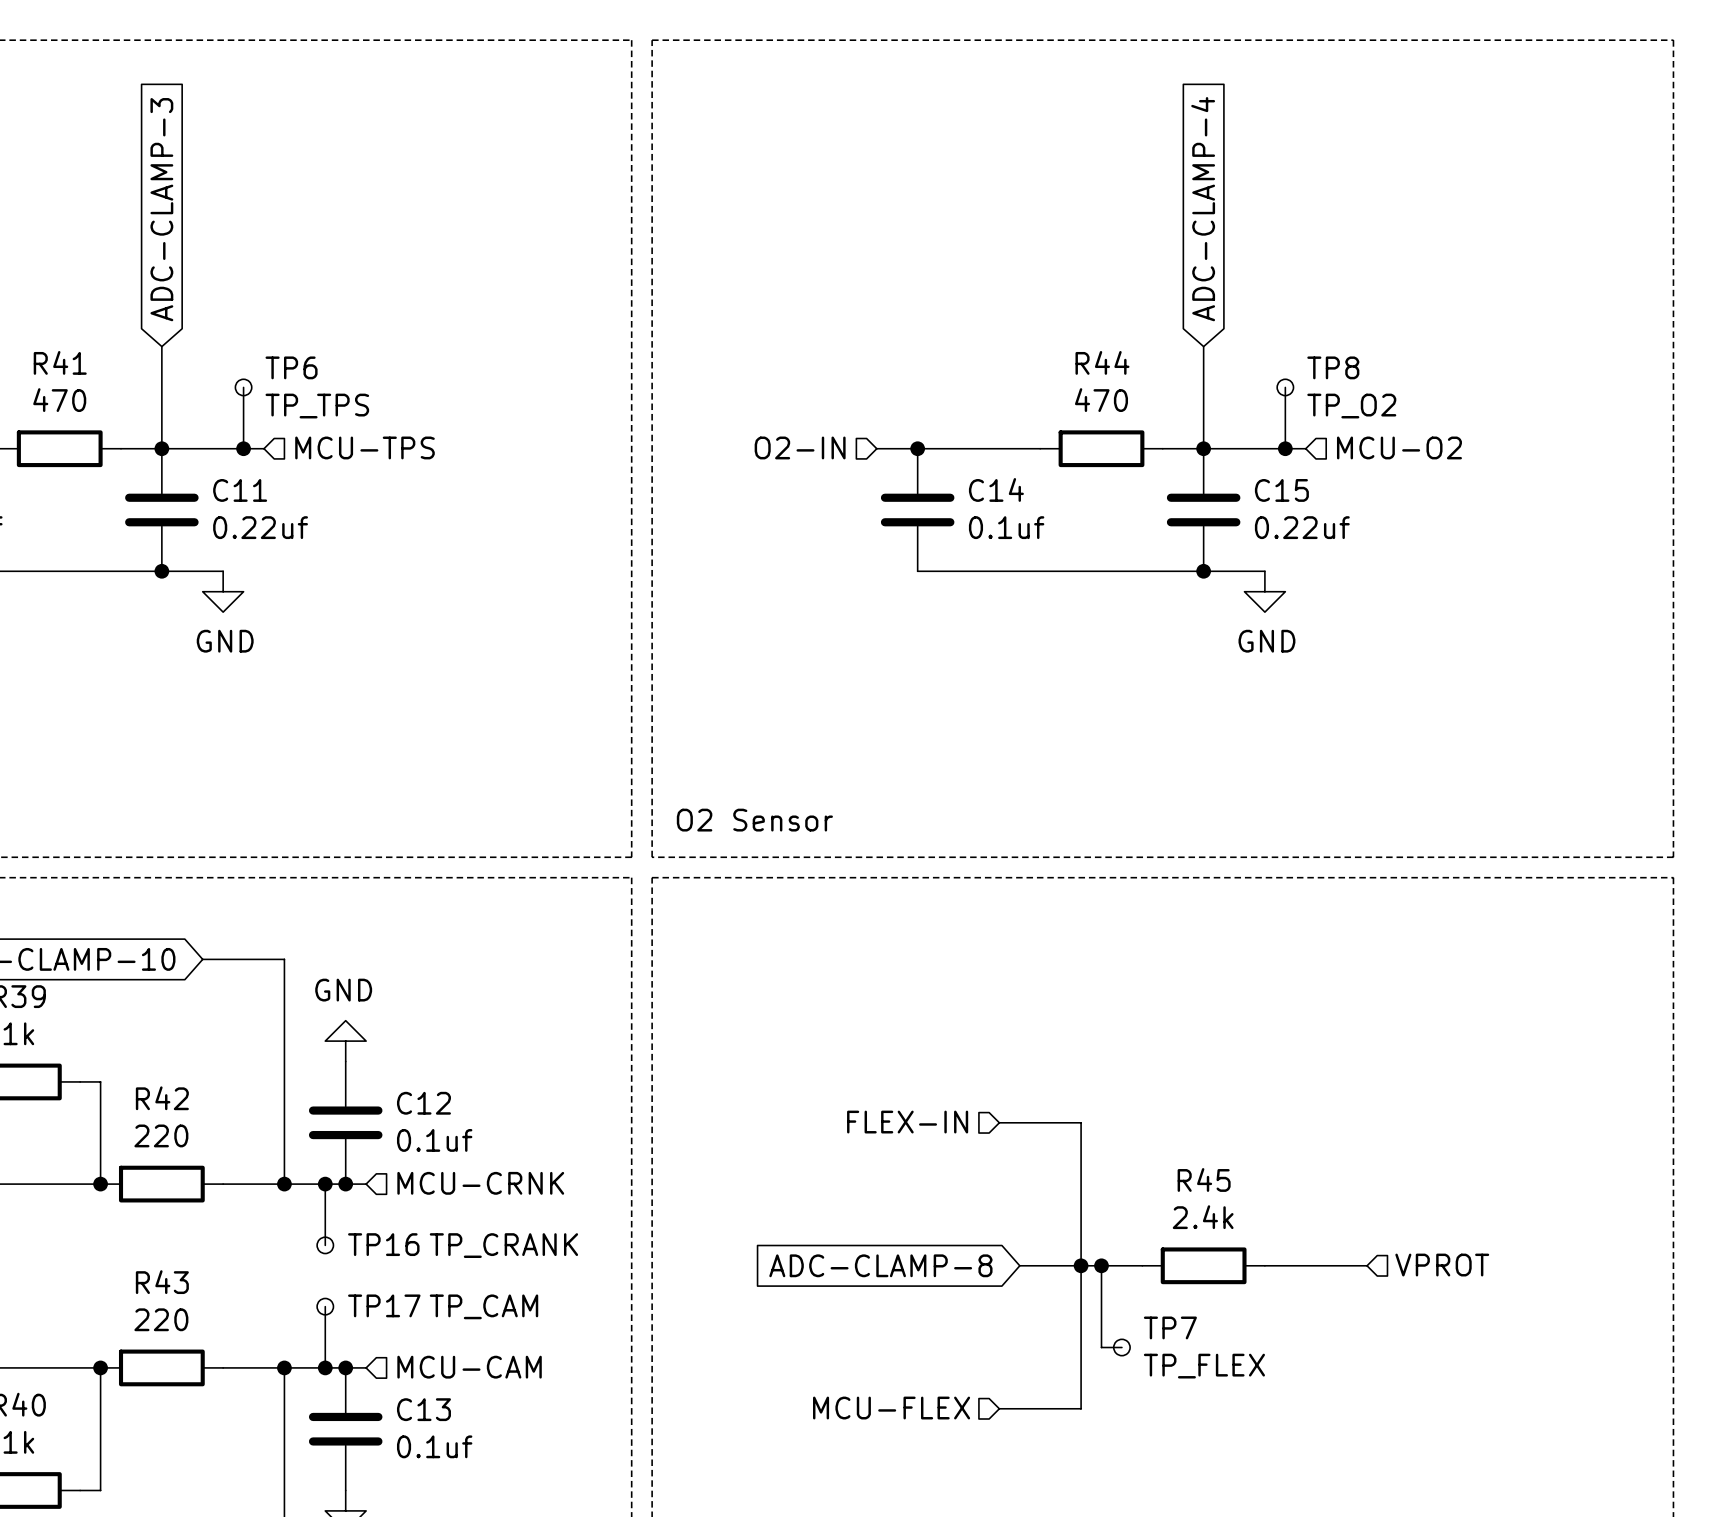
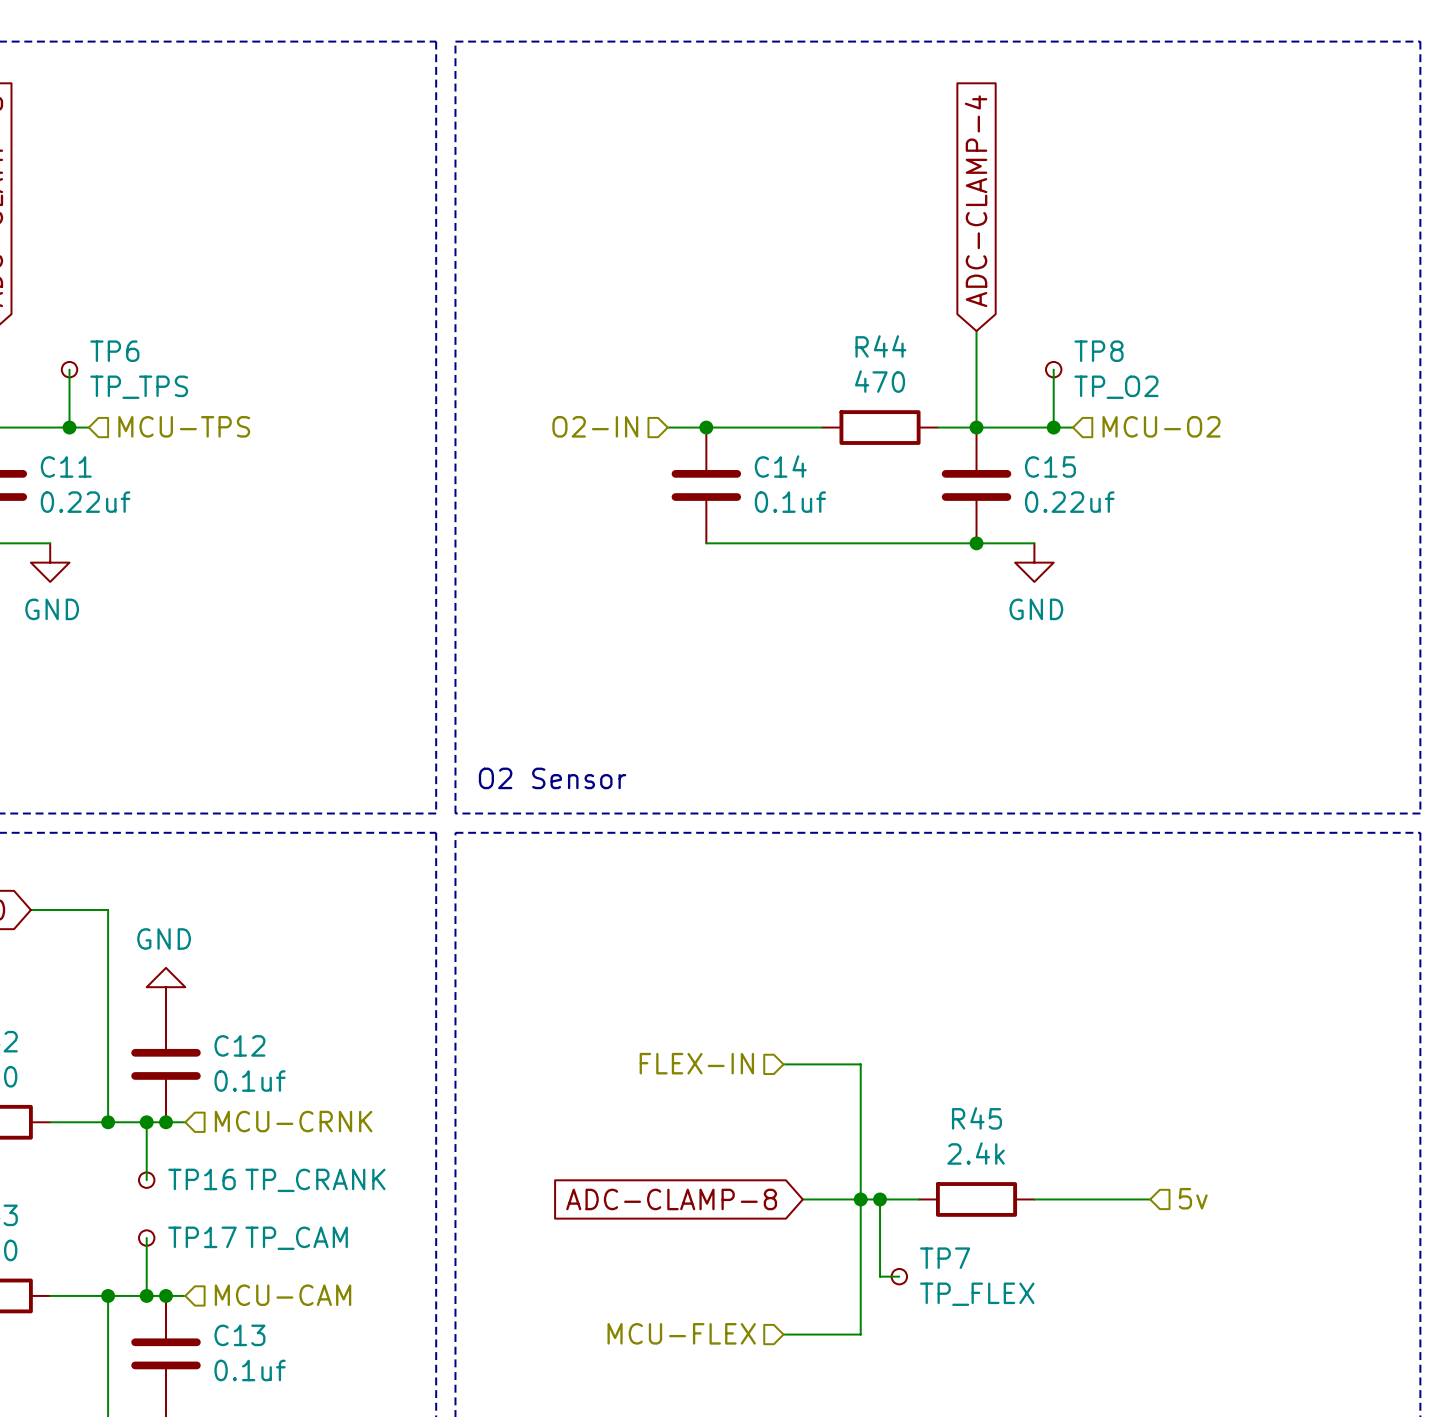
wire: none -> (1130, 1199) (1150, 1199)
hierarchical label: none -> 5v (1193, 1198)
hierarchical label: VPROT (1442, 1265) -> none

